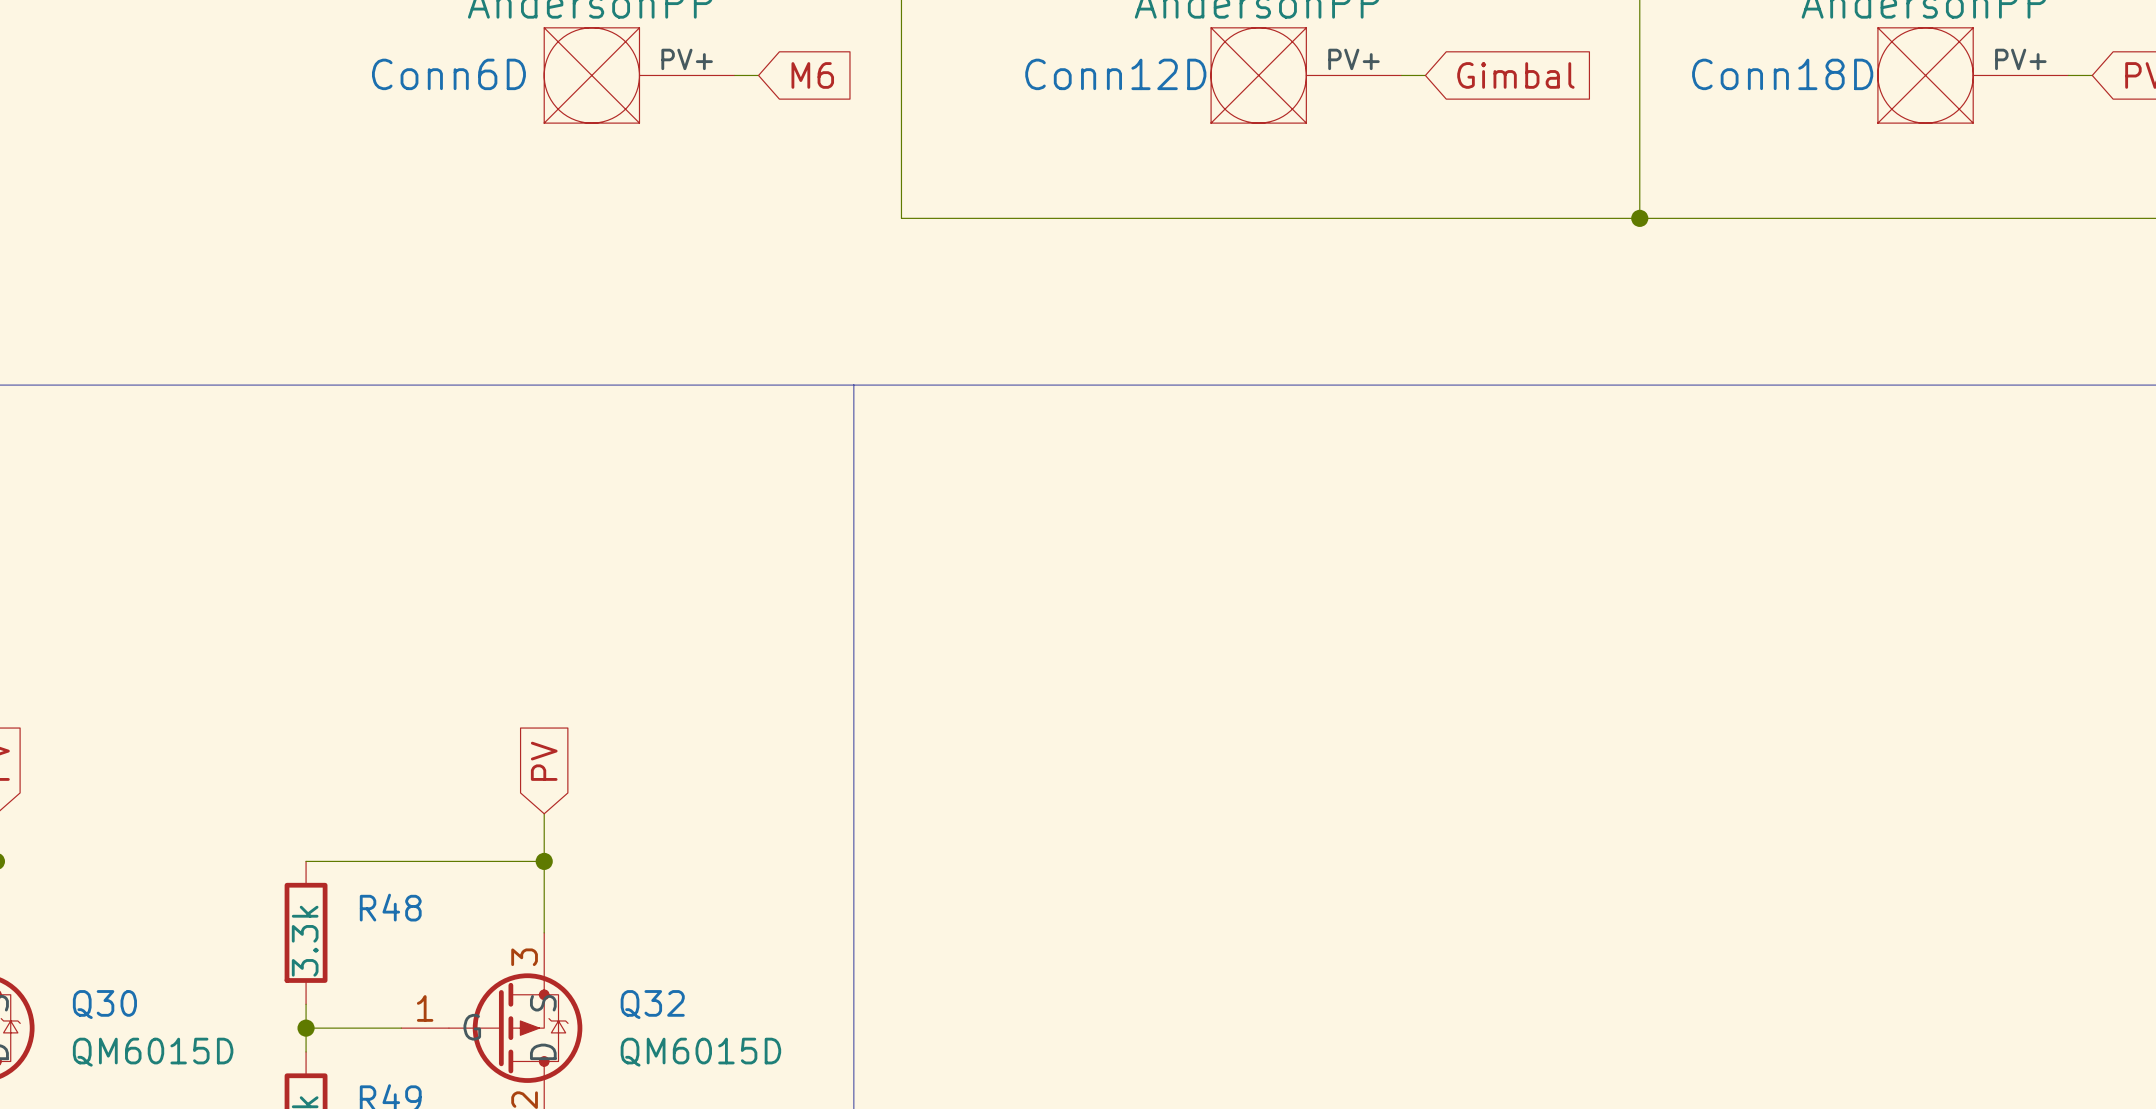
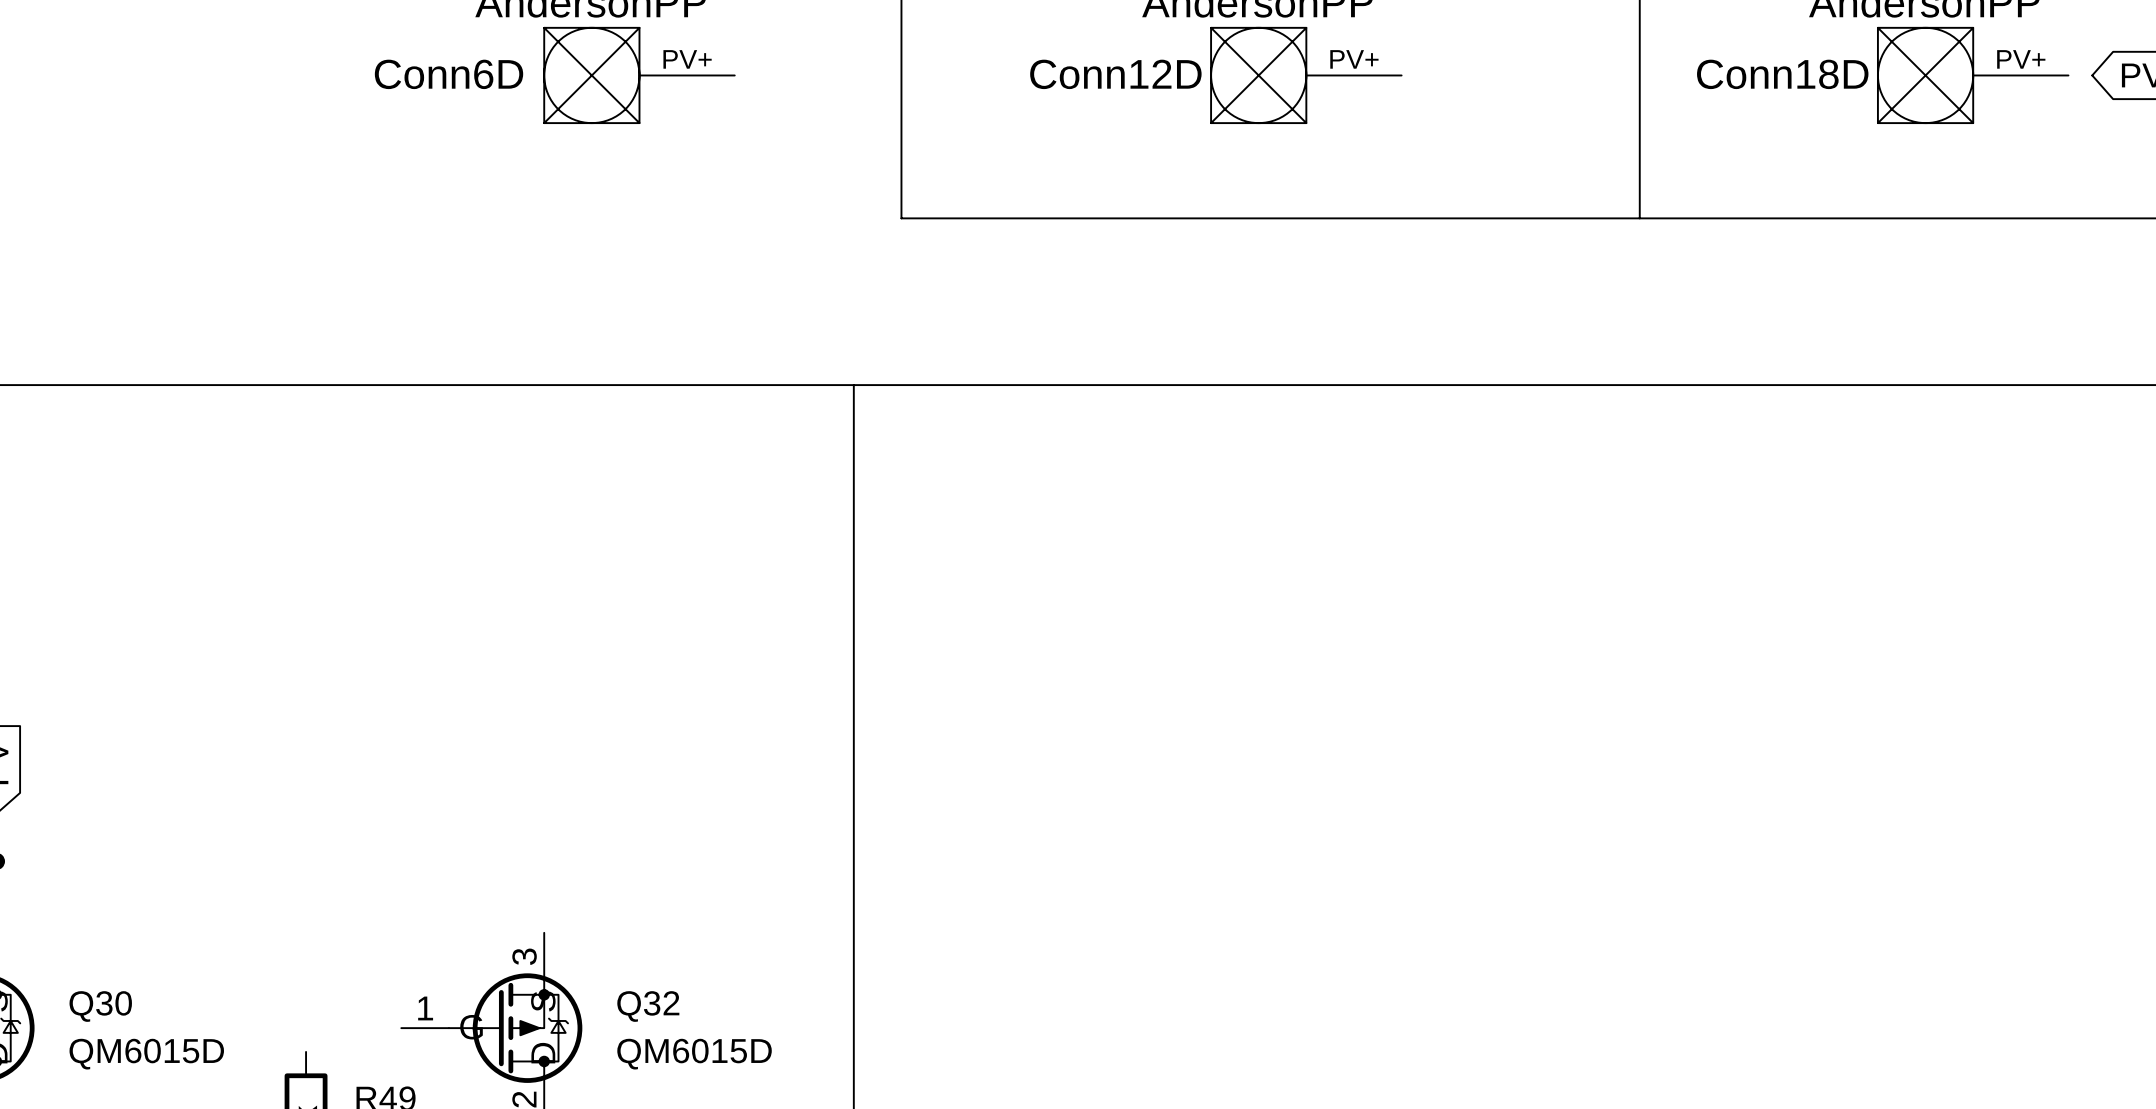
wire: (734, 75) (758, 75) -> none
global label: M6 (812, 75) -> none
wire: (1401, 75) (1425, 75) -> none
global label: Gimbal (1515, 75) -> none
wire: (2068, 75) (2092, 75) -> none
junction: (1639, 218) -> none
global label: PV (544, 761) -> none
wire: (544, 813) (544, 932) -> none
wire: (306, 861) (544, 861) -> none
junction: (544, 861) -> none
R48: 3.3k (306, 932) -> none
wire: (306, 1004) (306, 1051) -> none
wire: (306, 1028) (401, 1028) -> none
junction: (306, 1028) -> none

